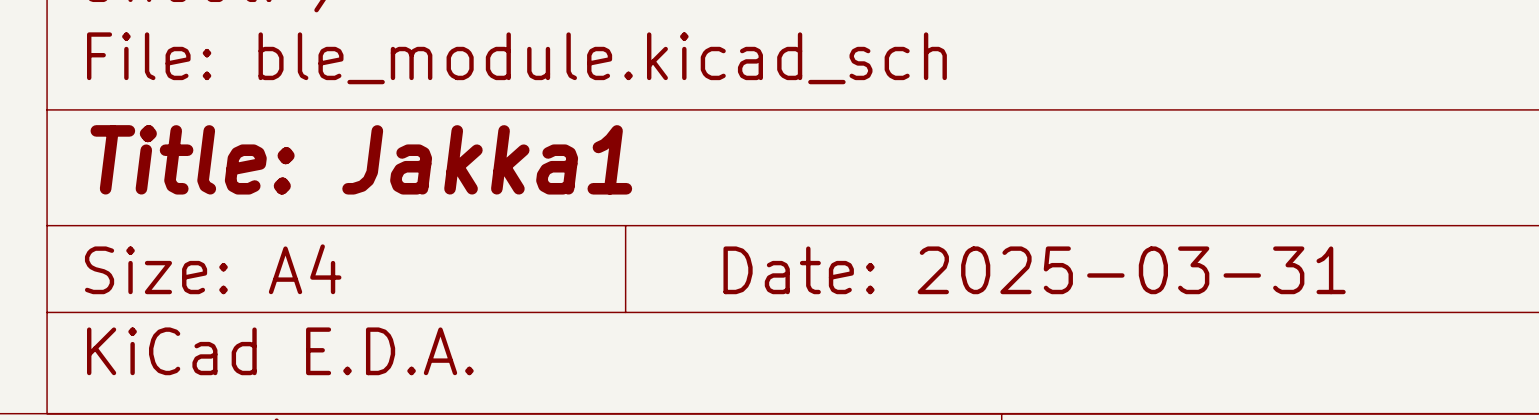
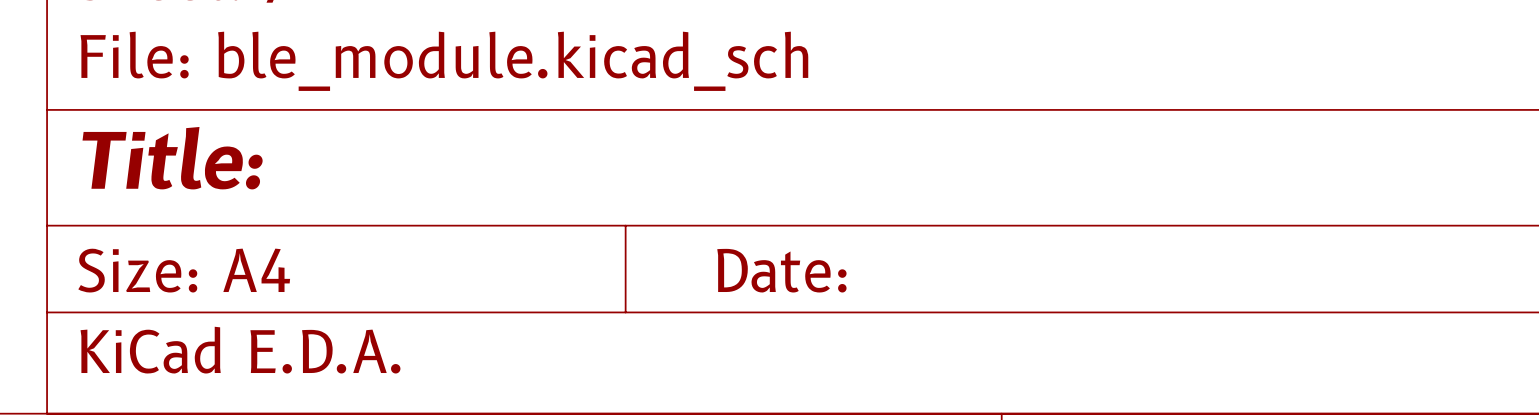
title block: Title: Jakka1 (361, 159) -> Title: (172, 158)
title block: Date: 2025-03-31 (1034, 270) -> Date: (781, 270)

